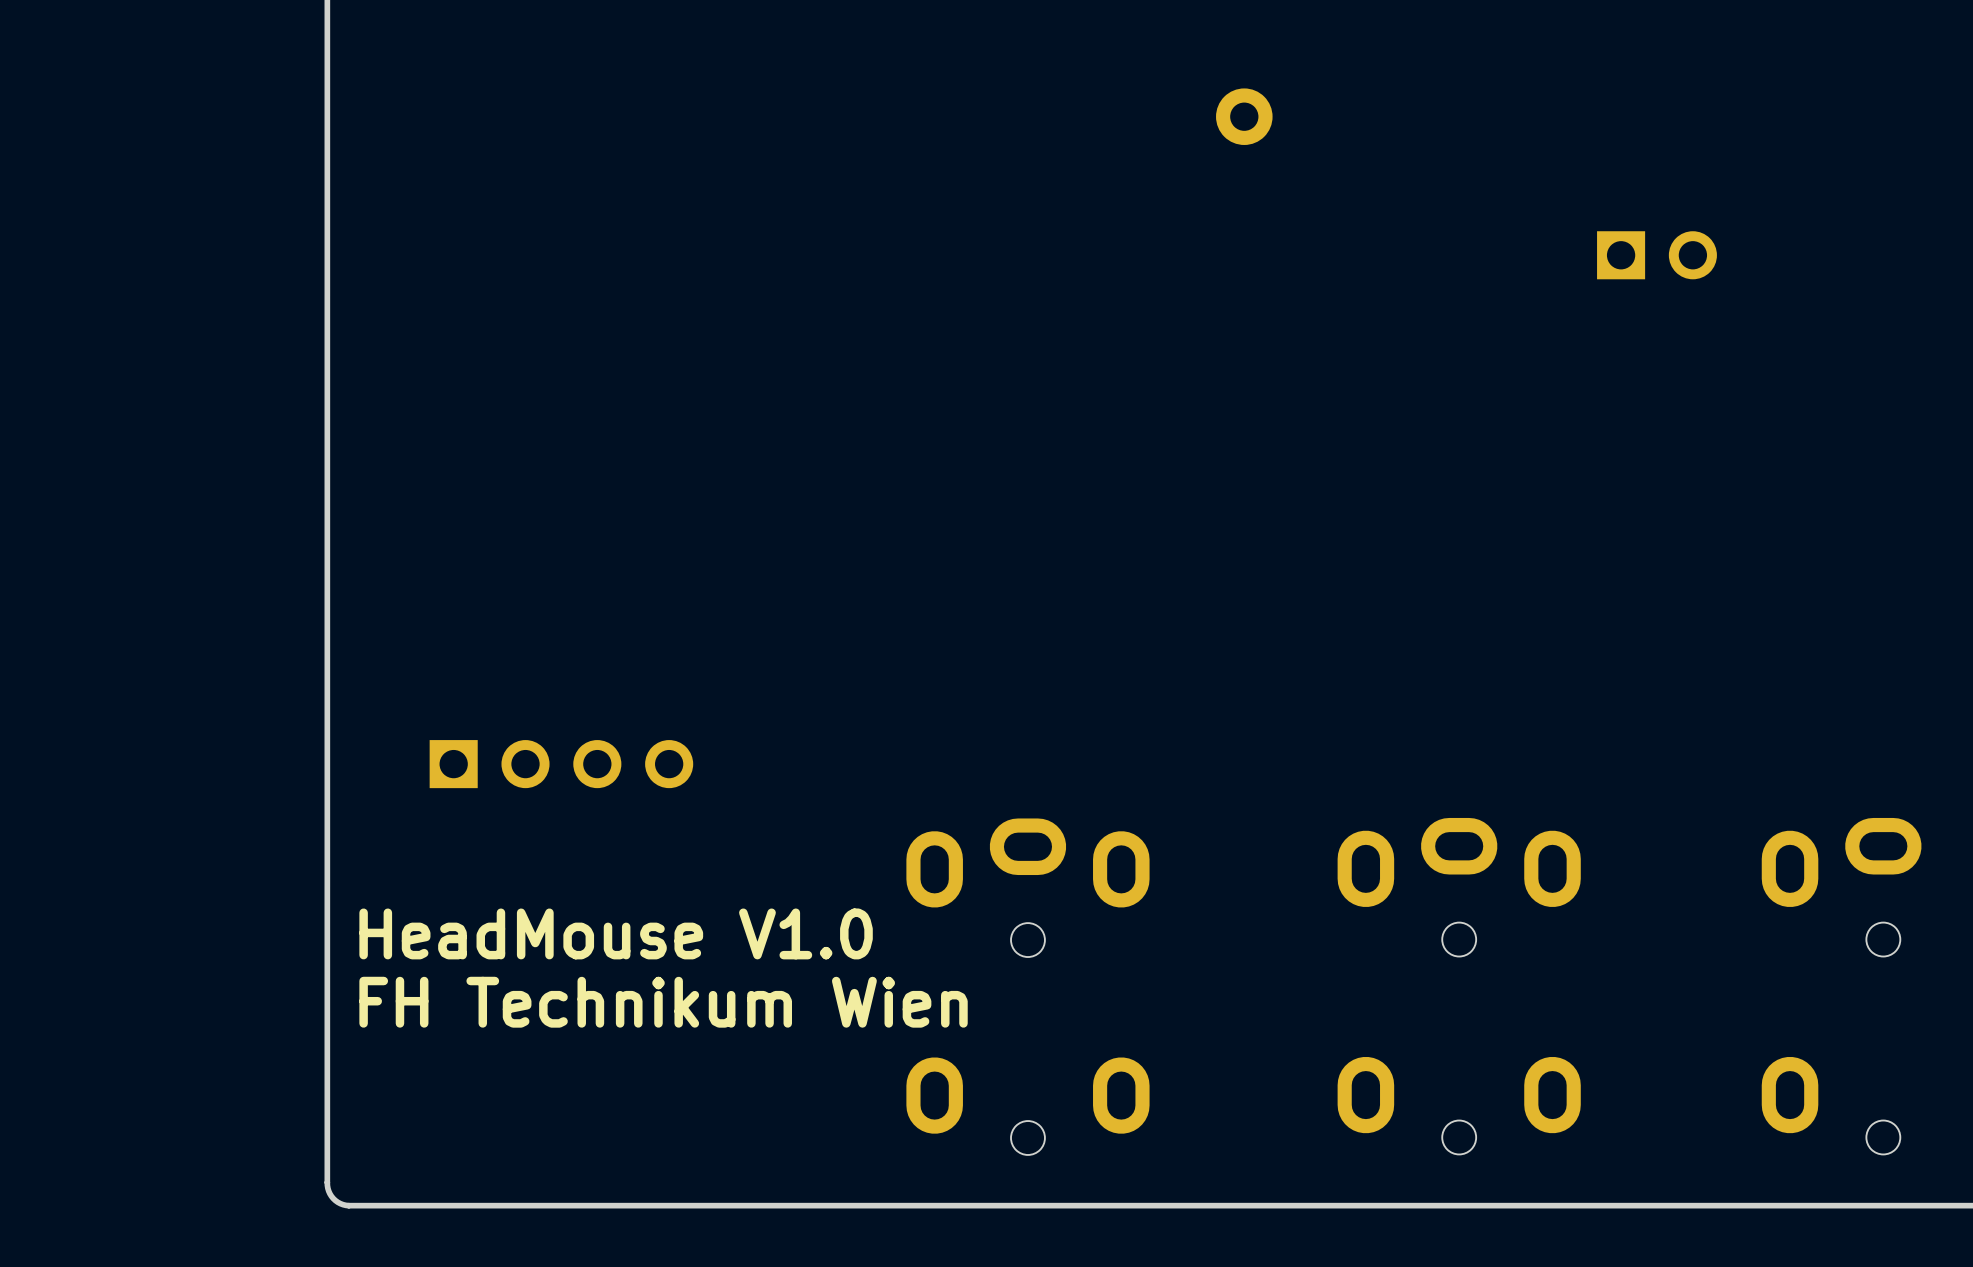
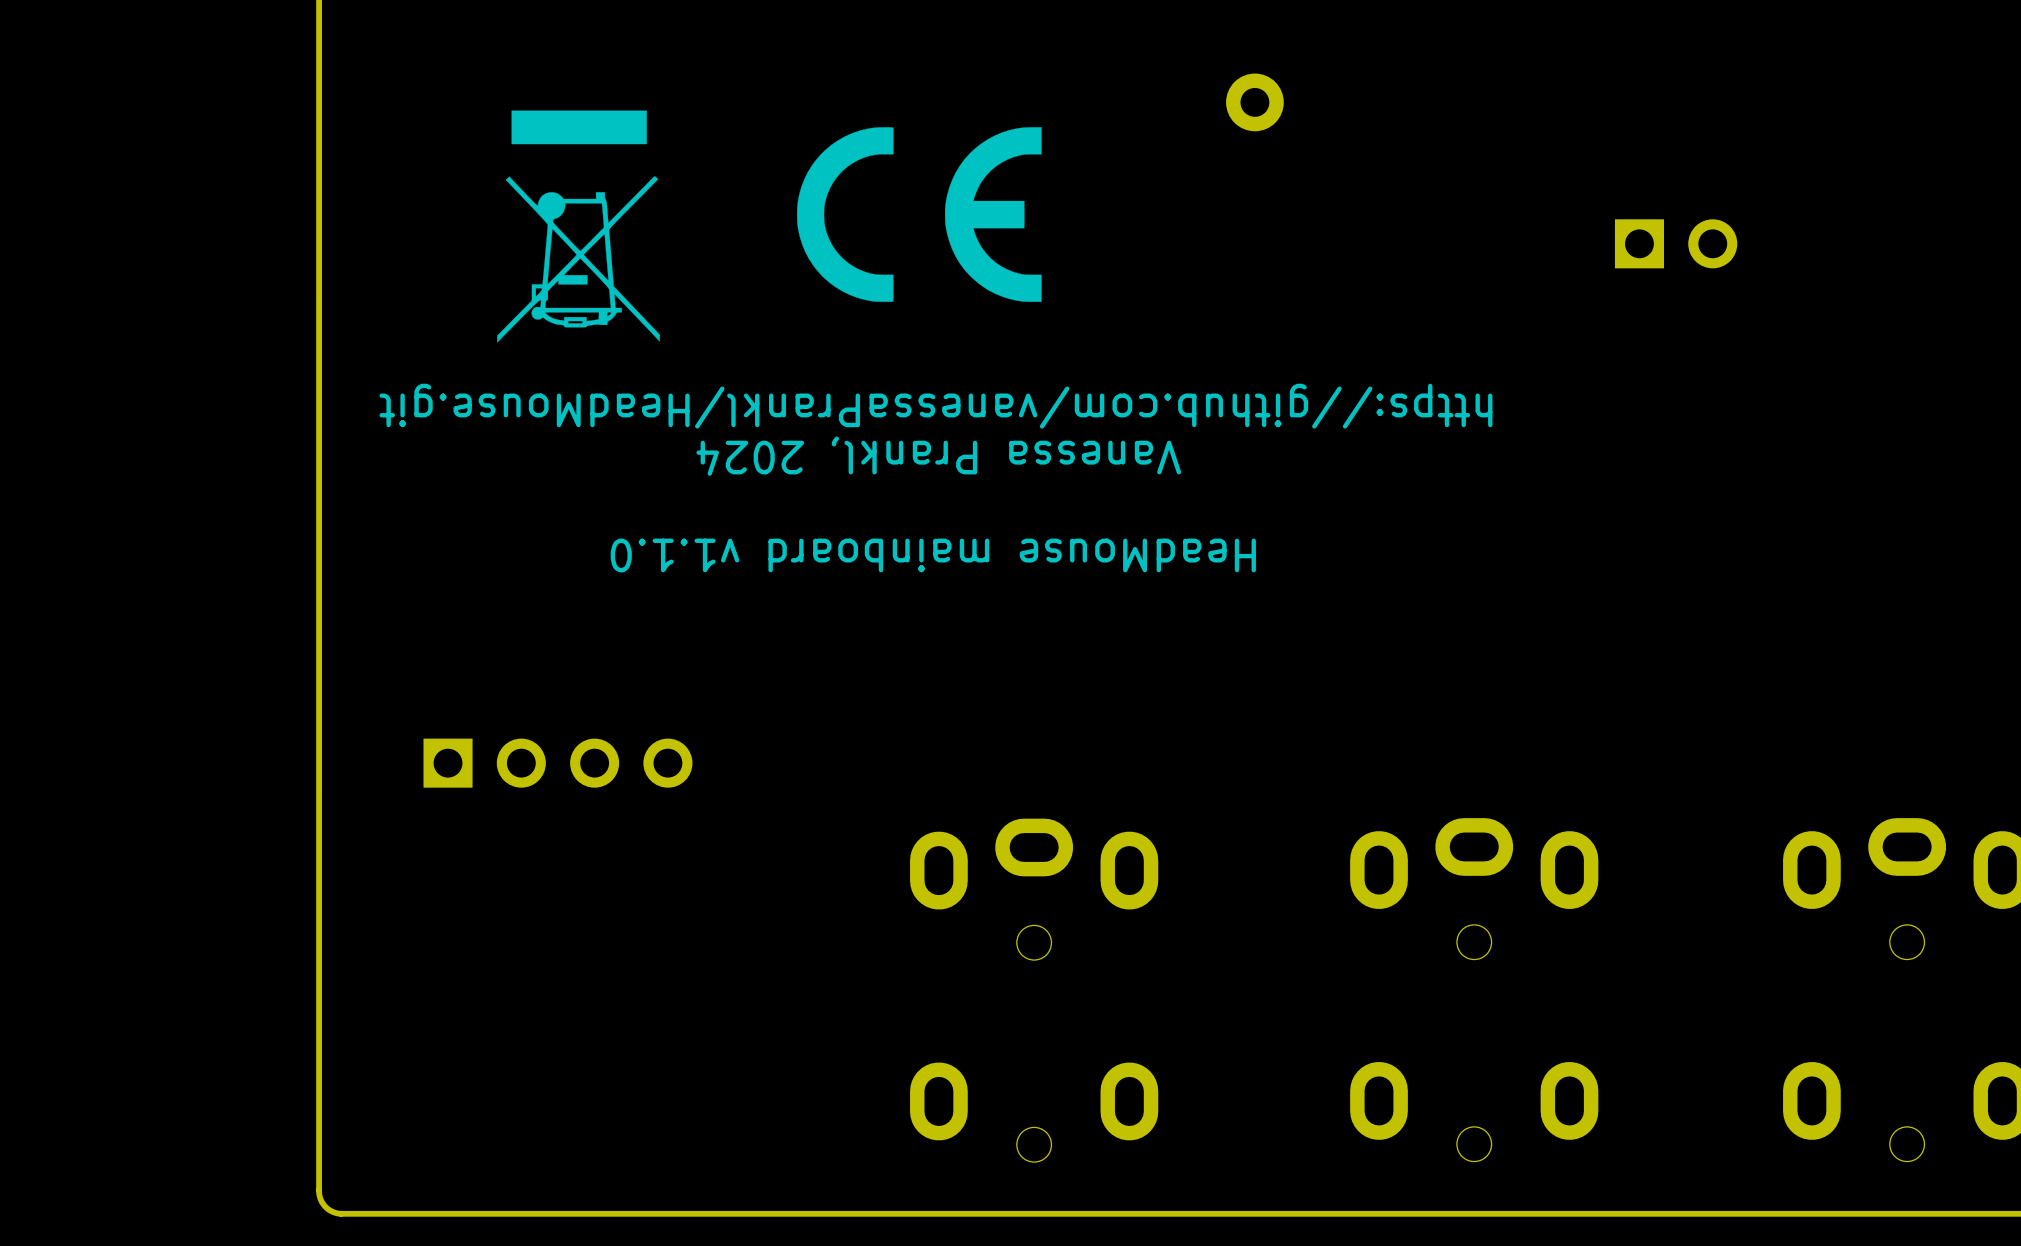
drawing: none -> [497, 110, 660, 343]
drawing: none -> [797, 127, 1042, 302]
text: none -> https://github.com/vanessaPrankl/HeadMouse.git (935, 406)
text: none -> Vanessa Prankl, 2024 (938, 456)
text: none -> HeadMouse mainboard v1.1.0 (933, 555)
text: HeadMouse V1.0 (616, 933) -> none
text: FH Technikum Wien (663, 1002) -> none

